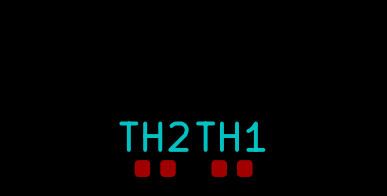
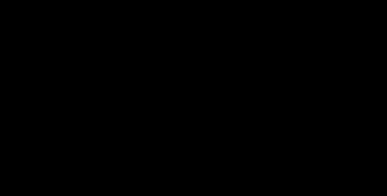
TH2: (155, 168) -> none
TH1: (231, 168) -> none

